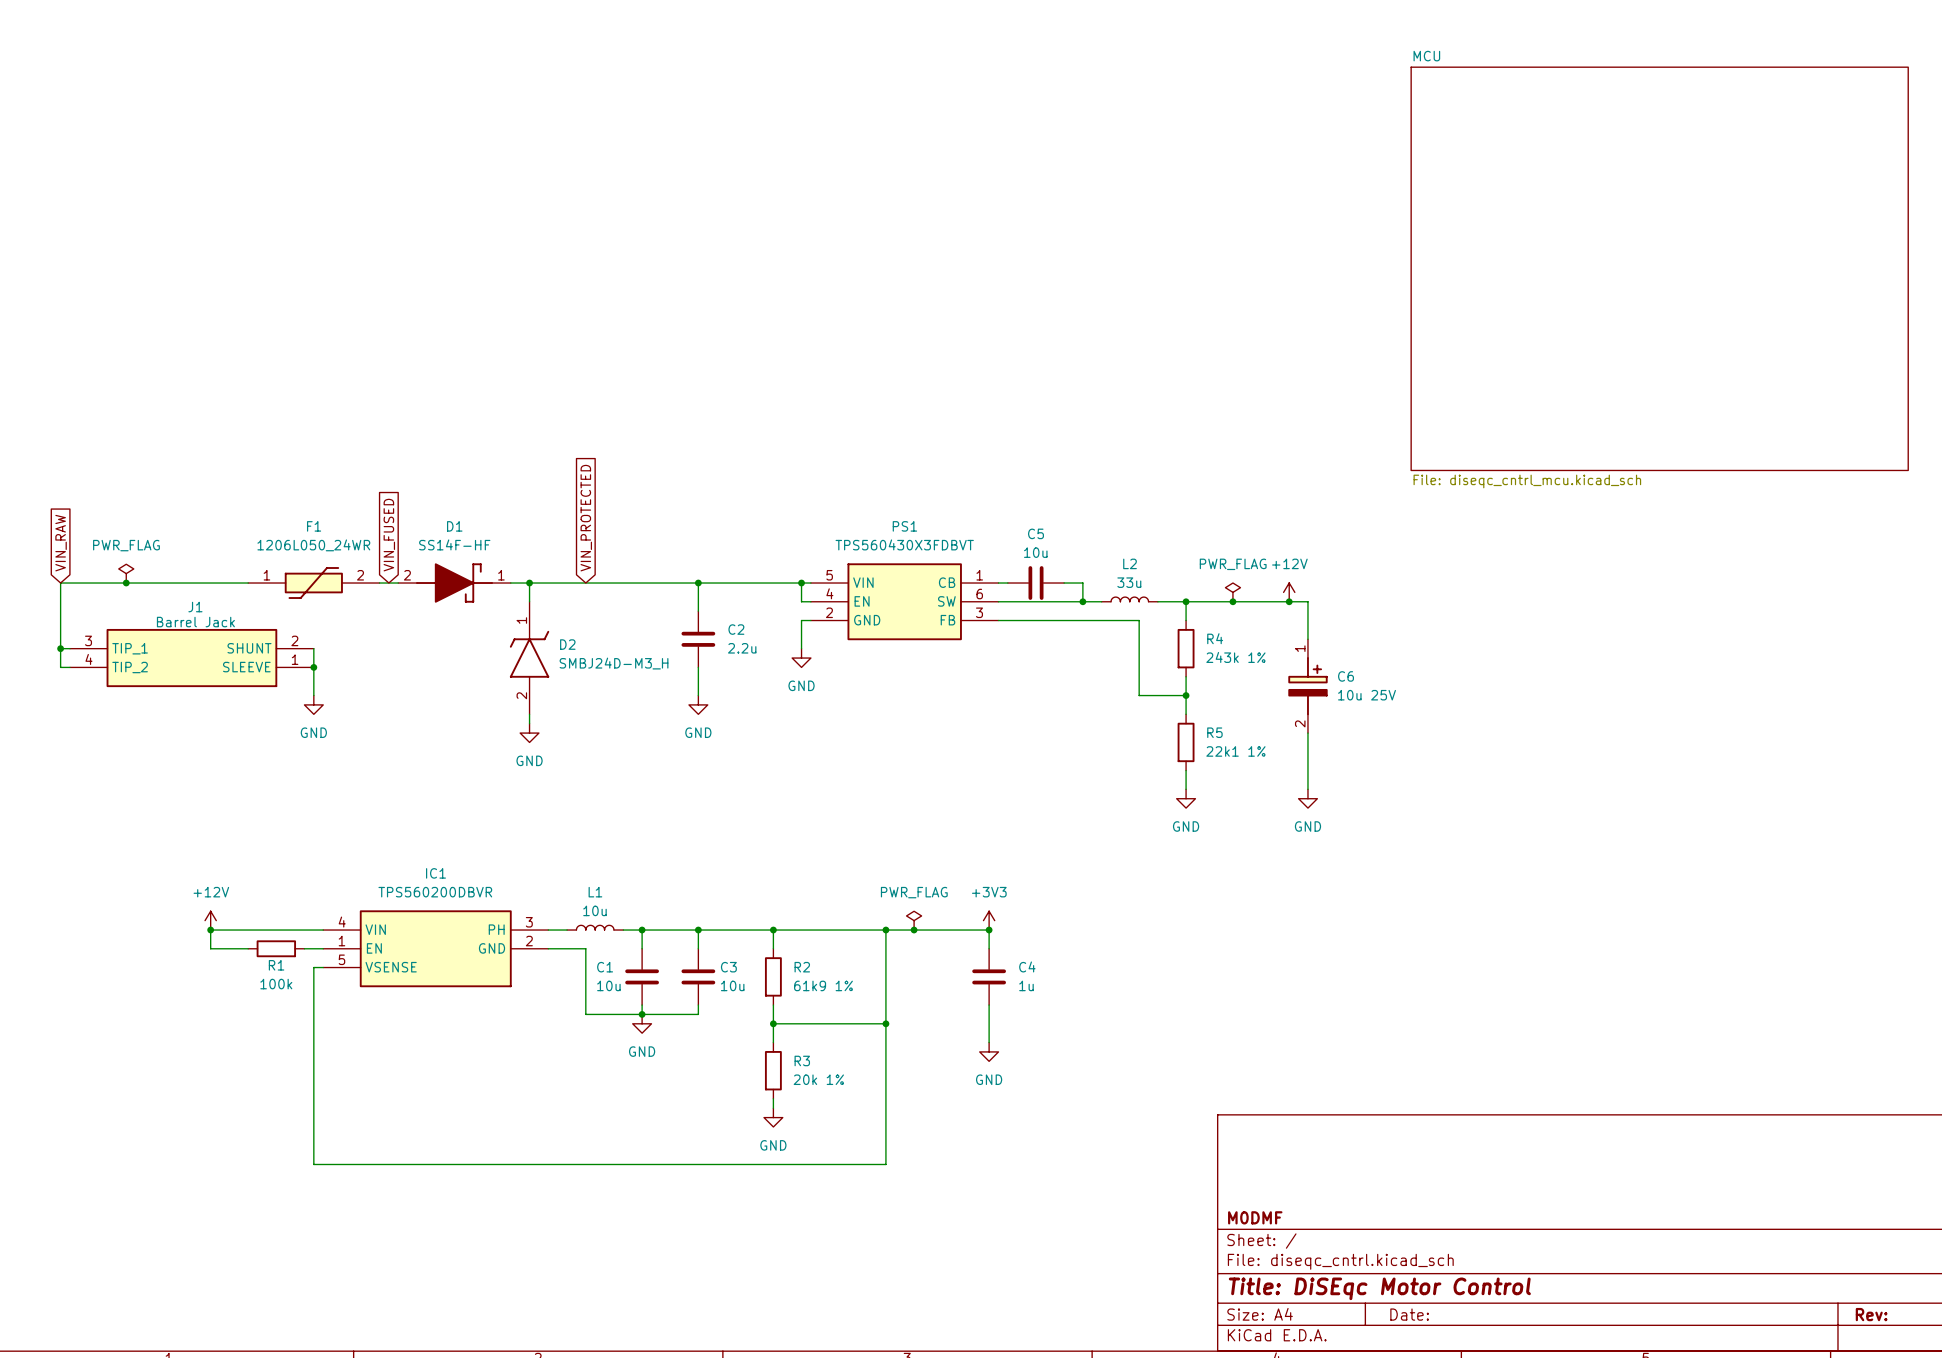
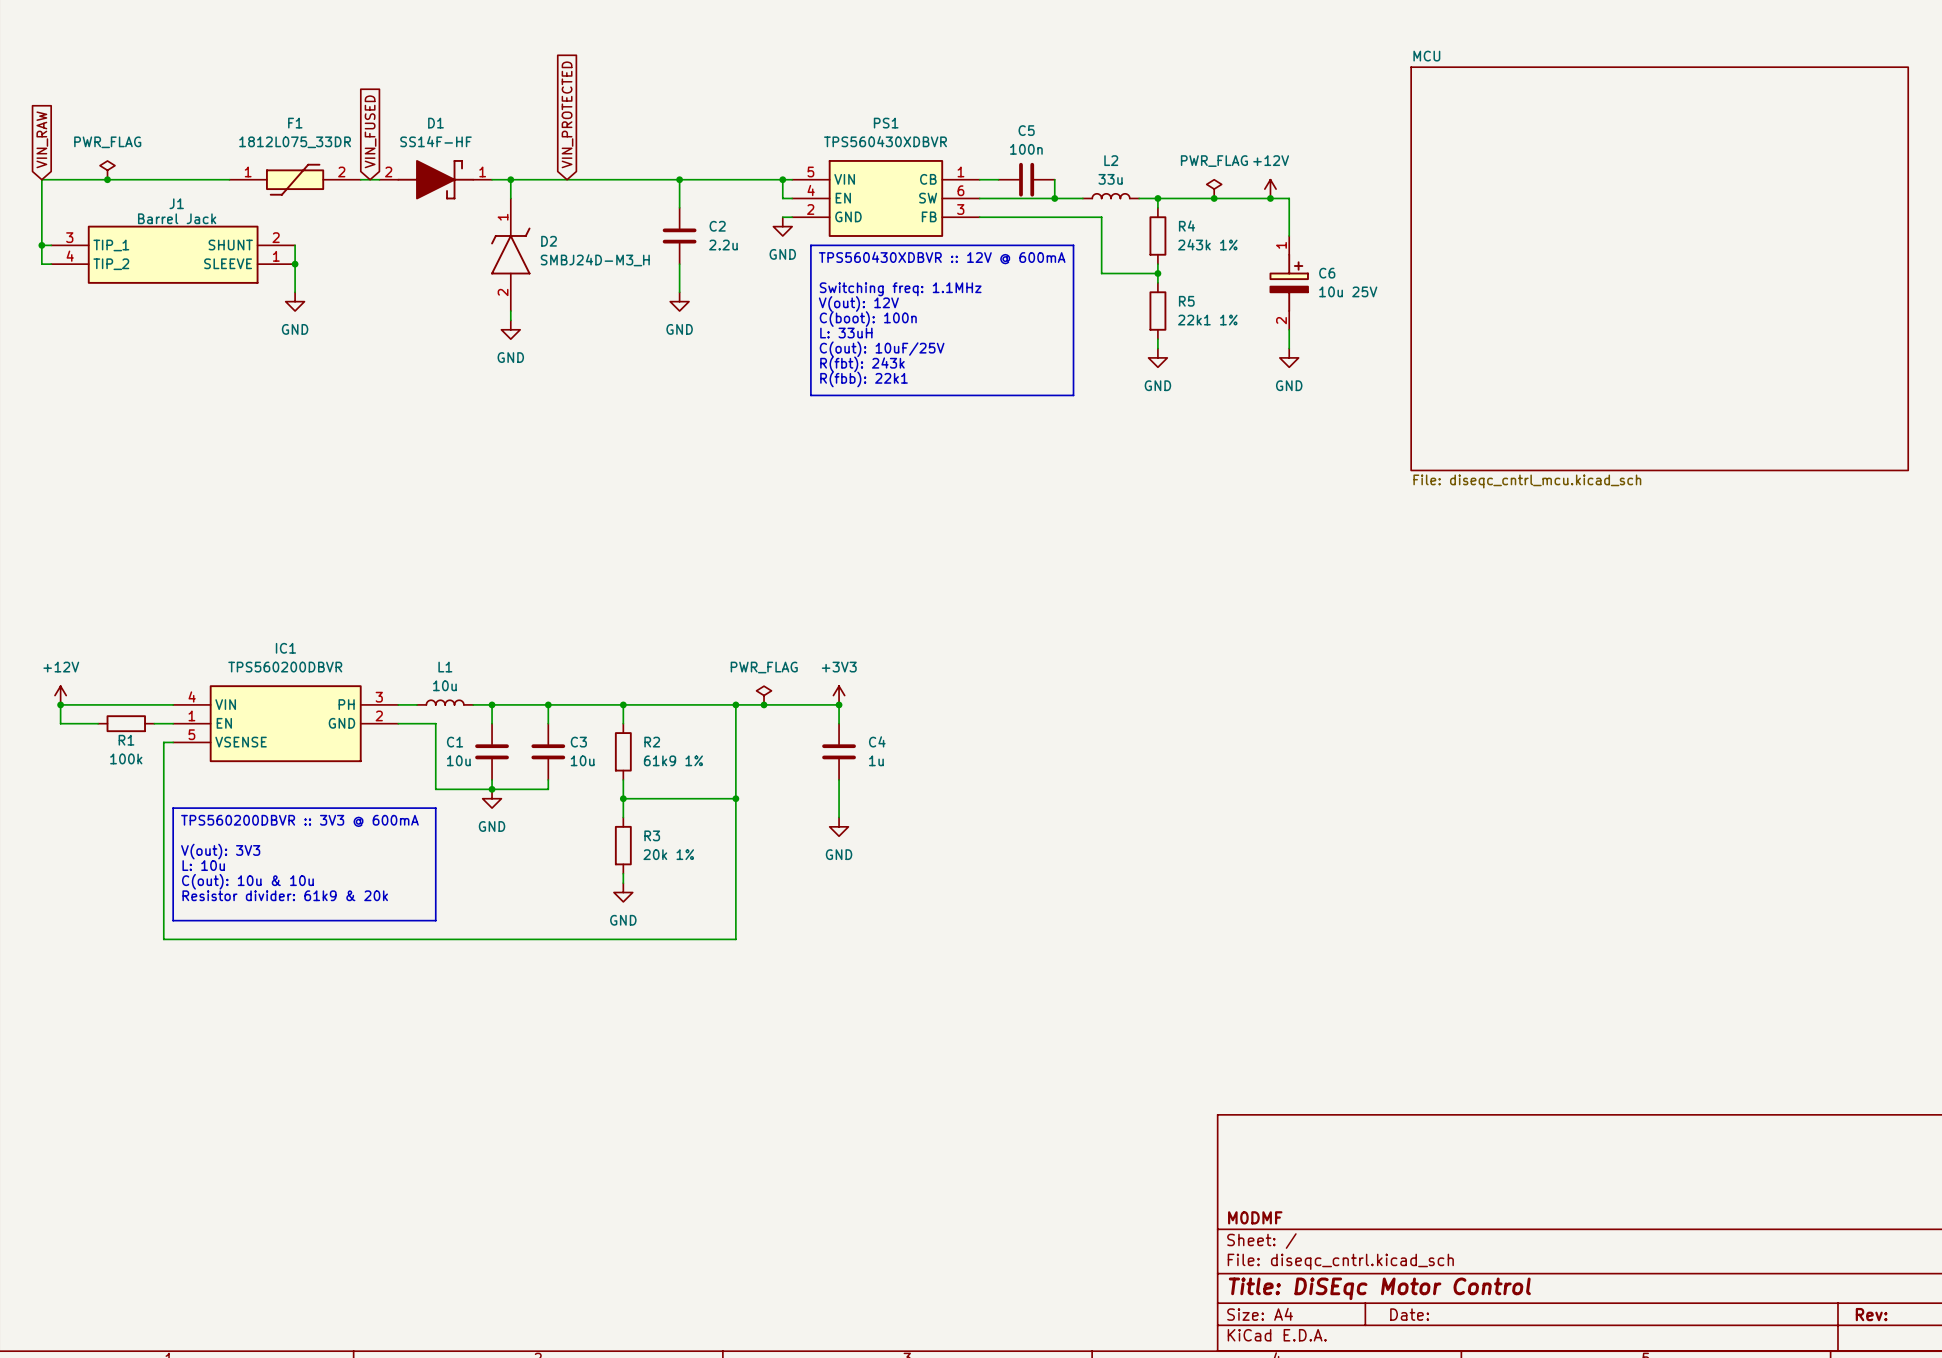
global label: none -> VIN_PROTECTED (567, 114)
global label: none -> VIN_FUSED (370, 131)
global label: none -> VIN_RAW (42, 139)
power symbol: none -> PWR_FLAG (107, 170)
junction: none -> (107, 179)
wire: none -> (229, 179) (41, 179) (41, 264) (51, 264)
wire: none -> (360, 179) (379, 179)
wire: none -> (492, 179) (792, 179)
wire: none -> (510, 179) (510, 198)
junction: none -> (510, 179)
wire: none -> (679, 179) (679, 207)
junction: none -> (679, 179)
wire: none -> (782, 179) (782, 198) (792, 198)
junction: none -> (782, 179)
wire: none -> (979, 179) (998, 179)
wire: none -> (1054, 179) (1054, 198)
power symbol: none -> PWR_FLAG (1214, 189)
power symbol: none -> +12V (1270, 189)
wire: none -> (979, 198) (1082, 198)
junction: none -> (1054, 198)
wire: none -> (1139, 198) (1289, 198) (1289, 235)
wire: none -> (1157, 198) (1157, 207)
junction: none -> (1157, 198)
junction: none -> (1214, 198)
junction: none -> (1270, 198)
wire: none -> (782, 217) (792, 217)
wire: none -> (979, 217) (1101, 217) (1101, 273) (1157, 273)
power symbol: none -> GND (782, 226)
wire: none -> (41, 245) (51, 245)
junction: none -> (41, 245)
wire: none -> (295, 245) (295, 292)
line: none -> (810, 245) (1073, 245) (1073, 395) (810, 395) (810, 245)
text: none -> TPS560430XDBVR :: 12V @ 600mA (942, 257)
junction: none -> (295, 264)
wire: none -> (679, 264) (679, 292)
wire: none -> (1157, 264) (1157, 282)
junction: none -> (1157, 273)
text: none -> Switching freq: 1.1MHz (900, 289)
power symbol: none -> GND (295, 301)
power symbol: none -> GND (679, 301)
text: none -> V(out): 12V (858, 303)
wire: none -> (510, 311) (510, 320)
text: none -> C(boot): 100n (868, 319)
power symbol: none -> GND (510, 329)
wire: none -> (1289, 329) (1289, 348)
text: none -> L: 33uH (846, 333)
wire: none -> (1157, 339) (1157, 348)
text: none -> C(out): 10uF/25V (882, 349)
power symbol: none -> GND (1157, 357)
power symbol: none -> GND (1289, 357)
text: none -> R(fbt): 243k (862, 364)
text: none -> R(fbb): 22k1 (864, 379)
global label: VIN_PROTECTED (586, 518) -> none
global label: VIN_FUSED (389, 535) -> none
global label: VIN_RAW (61, 543) -> none
PS1 value: TPS560430X3FDBVT (904, 544) -> TPS560430XDBVR (885, 141)
F1 value: 1206L050_24WR (313, 545) -> 1812L075_33DR (295, 142)
C5 value: 10u (1035, 552) -> 100n (1026, 149)
power symbol: PWR_FLAG (126, 573) -> none
junction: (126, 583) -> none
wire: (248, 583) (60, 583) (60, 667) (69, 667) -> none
F1 position: (313, 583) -> (295, 179)
wire: (379, 583) (398, 583) -> (398, 704) (417, 704)
D1 position: (454, 583) -> (435, 179)
wire: (510, 583) (810, 583) -> none
wire: (529, 583) (529, 601) -> (548, 704) (548, 723)
junction: (529, 583) -> none
wire: (698, 583) (698, 611) -> none
junction: (698, 583) -> none
wire: (801, 583) (801, 601) (810, 601) -> none
junction: (801, 583) -> none
wire: (998, 583) (1007, 583) -> none
C5 position: (1036, 583) -> (1026, 179)
wire: (1064, 583) (1082, 583) (1082, 601) -> none
power symbol: PWR_FLAG (1232, 592) -> none
power symbol: +12V (1289, 592) -> none
L2 position: (1129, 599) -> (1111, 196)
PS1 position: (904, 601) -> (885, 198)
wire: (998, 601) (1101, 601) -> none
junction: (1082, 601) -> none
wire: (1157, 601) (1307, 601) (1307, 639) -> none
wire: (1186, 601) (1186, 620) -> none
junction: (1186, 601) -> none
junction: (1232, 601) -> none
junction: (1289, 601) -> none
wire: (810, 620) (801, 620) (801, 648) -> none
wire: (998, 620) (1139, 620) (1139, 695) (1186, 695) -> none
C2 position: (698, 639) -> (679, 235)
wire: (60, 648) (69, 648) -> none
junction: (60, 648) -> none
wire: (313, 648) (313, 695) -> none
R4 position: (1186, 648) -> (1157, 235)
J1 position: (191, 658) -> (173, 254)
D2 position: (529, 658) -> (510, 254)
power symbol: GND (801, 658) -> none
junction: (313, 667) -> none
wire: (698, 667) (698, 695) -> none
wire: (1186, 676) (1186, 714) -> none
C6 position: (1307, 686) -> (1289, 282)
power symbol: none -> +12V (60, 695)
power symbol: none -> PWR_FLAG (764, 695)
power symbol: none -> +3V3 (839, 695)
junction: (1186, 695) -> none
junction: none -> (60, 704)
wire: none -> (173, 704) (60, 704) (60, 723) (98, 723)
power symbol: GND (313, 704) -> none
wire: none -> (473, 704) (839, 704) (839, 723)
wire: none -> (492, 704) (492, 723)
junction: none -> (492, 704)
junction: none -> (548, 704)
wire: none -> (623, 704) (623, 723)
junction: none -> (623, 704)
power symbol: GND (698, 704) -> none
wire: none -> (735, 704) (735, 939) (163, 939) (163, 742) (173, 742)
junction: none -> (735, 704)
junction: none -> (764, 704)
junction: none -> (839, 704)
wire: (529, 714) (529, 723) -> (492, 779) (492, 789)
wire: none -> (154, 723) (173, 723)
wire: none -> (398, 723) (435, 723) (435, 789) (548, 789) (548, 779)
power symbol position: GND (529, 733) -> GND (492, 798)
wire: (1307, 733) (1307, 789) -> none
R5 position: (1186, 742) -> (1157, 311)
wire: (1186, 770) (1186, 789) -> none
wire: none -> (623, 779) (623, 817)
wire: none -> (839, 779) (839, 817)
junction: none -> (492, 789)
wire: none -> (623, 798) (735, 798)
junction: none -> (623, 798)
junction: none -> (735, 798)
power symbol: GND (1186, 798) -> none
power symbol: GND (1307, 798) -> none
line: none -> (173, 808) (435, 808) (435, 920) (173, 920) (173, 808)
text: none -> TPS560200DBVR :: 3V3 @ 600mA (299, 820)
power symbol: none -> GND (839, 826)
text: none -> V(out): 3V3 (220, 851)
text: none -> L: 10u (203, 865)
text: none -> C(out): 10u & 10u (247, 881)
power symbol: none -> GND (623, 892)
text: none -> Resistor divider: 61k9 & 20k (285, 895)
power symbol: +12V (210, 920) -> none
power symbol: PWR_FLAG (914, 920) -> none
power symbol: +3V3 (989, 920) -> none
L1 position: (595, 927) -> (445, 702)
junction: (210, 930) -> none
wire: (323, 930) (210, 930) (210, 948) (248, 948) -> none
wire: (548, 930) (567, 930) -> none
wire: (623, 930) (989, 930) (989, 948) -> none
wire: (642, 930) (642, 948) -> none
junction: (642, 930) -> none
wire: (698, 930) (698, 948) -> none
junction: (698, 930) -> none
wire: (773, 930) (773, 948) -> none
junction: (773, 930) -> none
wire: (885, 930) (885, 1164) (313, 1164) (313, 967) (323, 967) -> none
junction: (885, 930) -> none
junction: (914, 930) -> none
junction: (989, 930) -> none
R1 position: (276, 948) -> (126, 723)
wire: (304, 948) (323, 948) -> none
IC1 position: (435, 948) -> (285, 723)
wire: (548, 948) (585, 948) (585, 1014) (698, 1014) (698, 1005) -> none
C1 position: (642, 976) -> (492, 751)
C3 position: (698, 976) -> (548, 751)
R2 position: (773, 976) -> (623, 751)
C4 position: (989, 976) -> (839, 751)
wire: (642, 1005) (642, 1014) -> (623, 873) (623, 883)
wire: (773, 1005) (773, 1042) -> none
wire: (989, 1005) (989, 1042) -> none
junction: (642, 1014) -> none
power symbol: GND (642, 1023) -> none
wire: (773, 1023) (885, 1023) -> none
junction: (773, 1023) -> none
junction: (885, 1023) -> none
power symbol: GND (989, 1051) -> none
R3 position: (773, 1070) -> (623, 845)
wire: (773, 1098) (773, 1108) -> none
power symbol: GND (773, 1117) -> none

